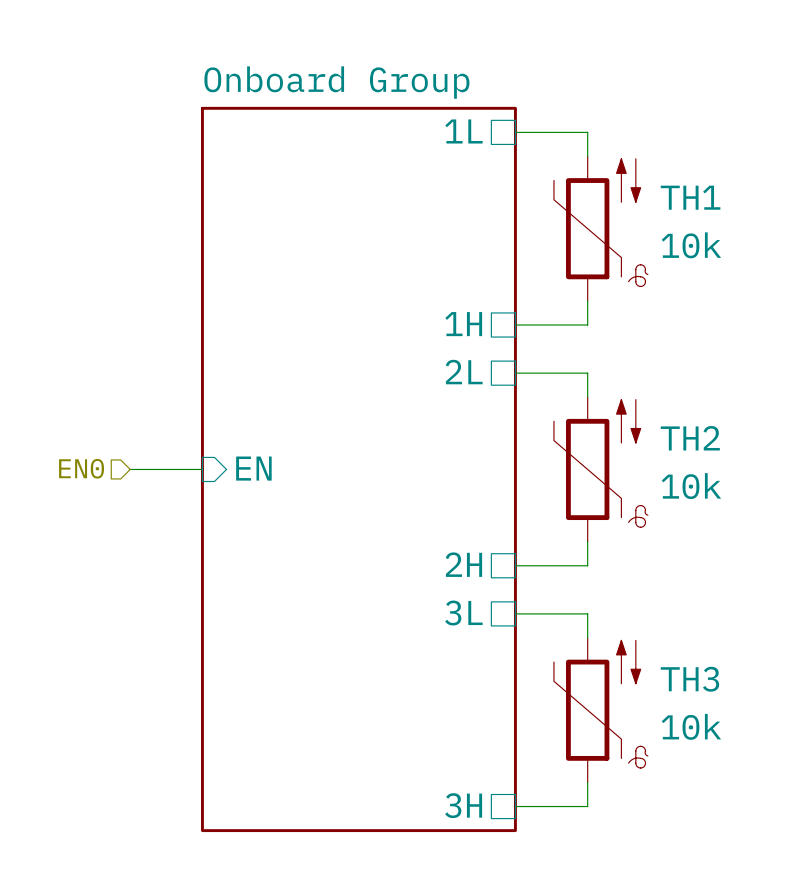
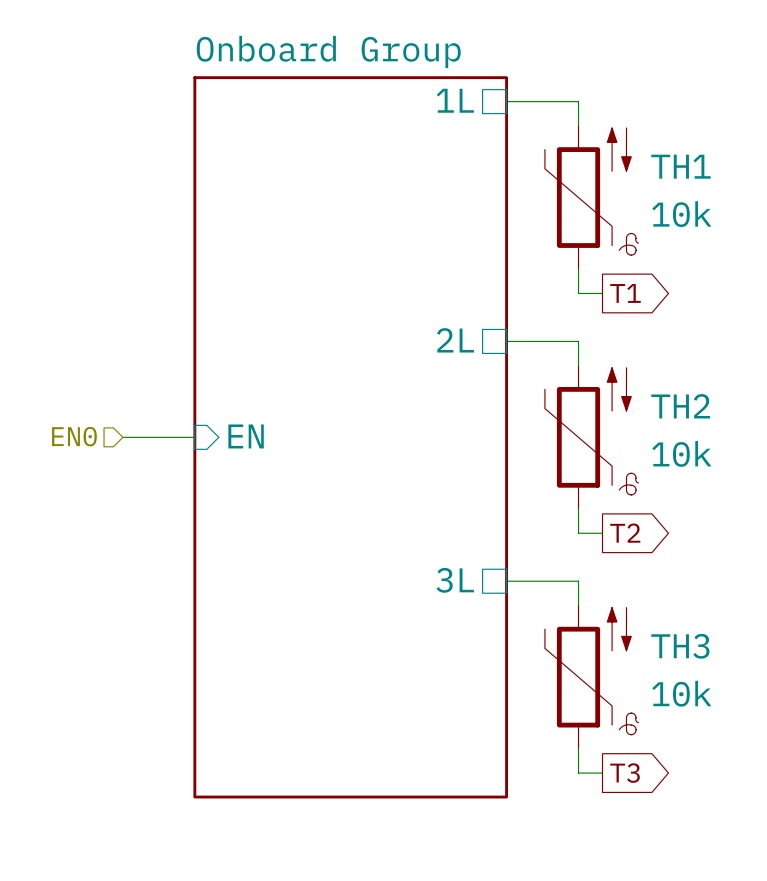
sheet pin: 1H (463, 324) -> none
wire: (515, 325) (587, 325) -> (602, 293) (578, 293)
global label: none -> T1 (625, 293)
sheet pin: 2H (463, 564) -> none
wire: (515, 565) (587, 565) -> (602, 533) (578, 533)
global label: none -> T2 (625, 533)
sheet pin: 3H (463, 805) -> none
wire: (515, 806) (587, 806) -> (602, 773) (578, 773)
global label: none -> T3 (625, 773)

